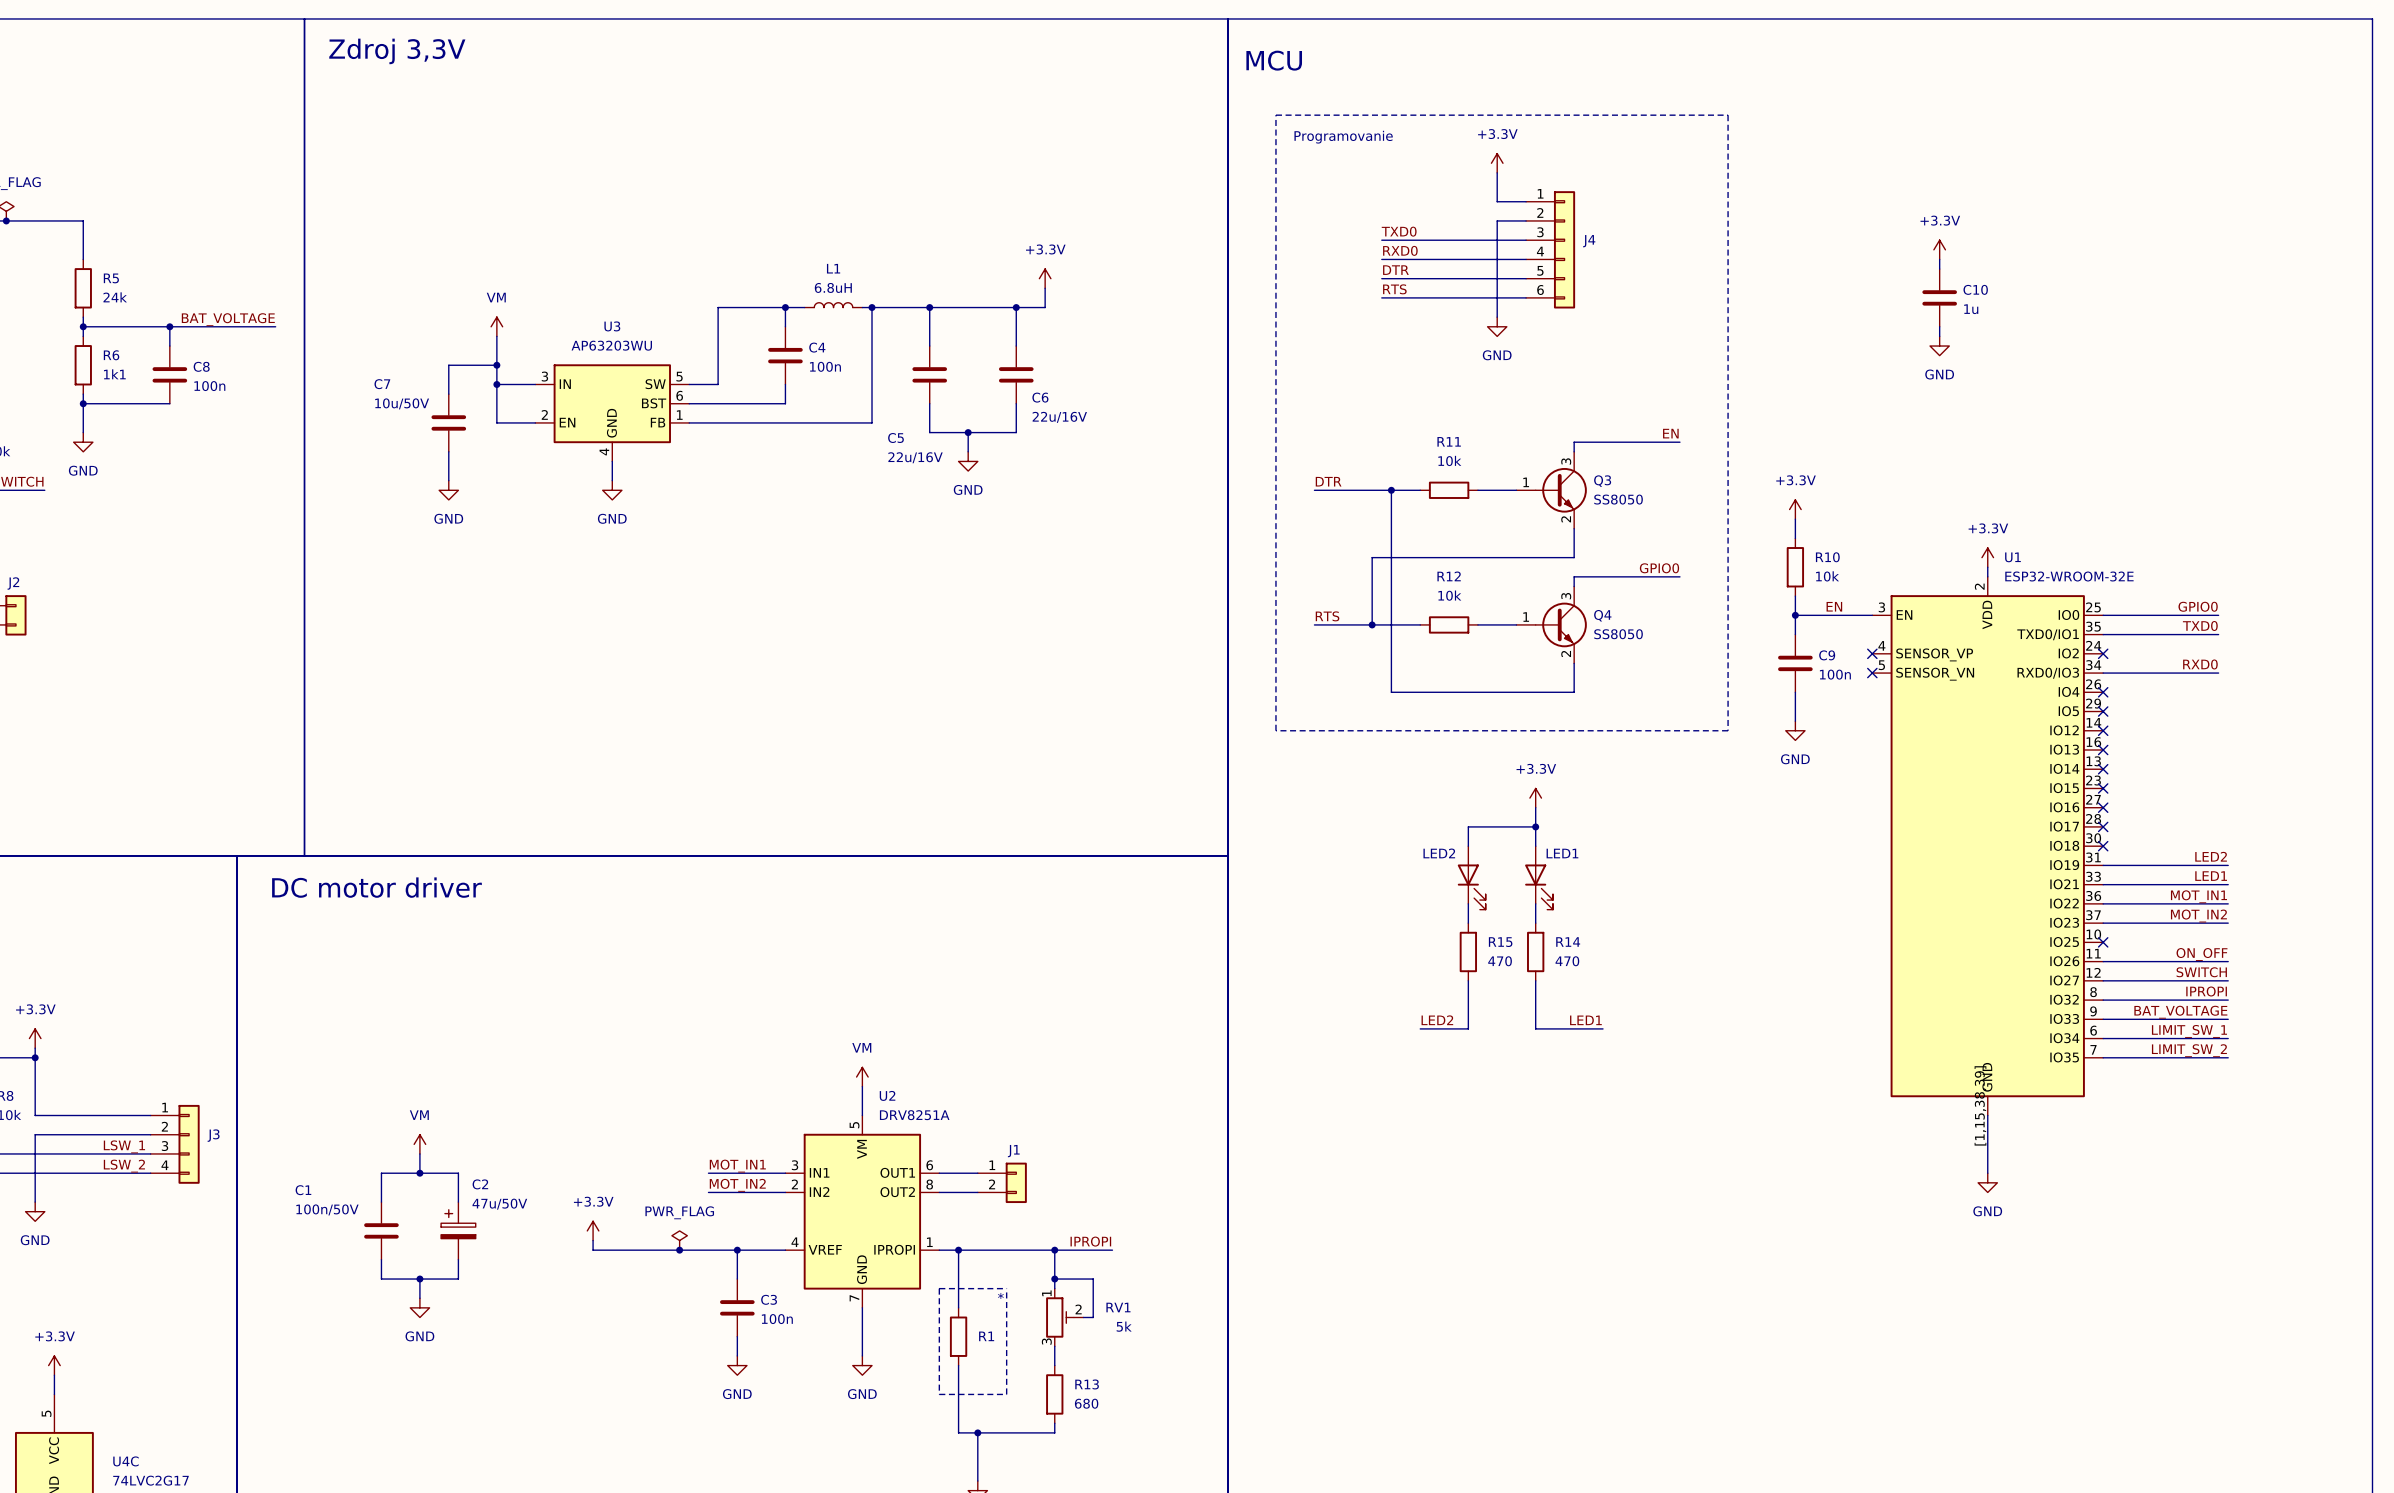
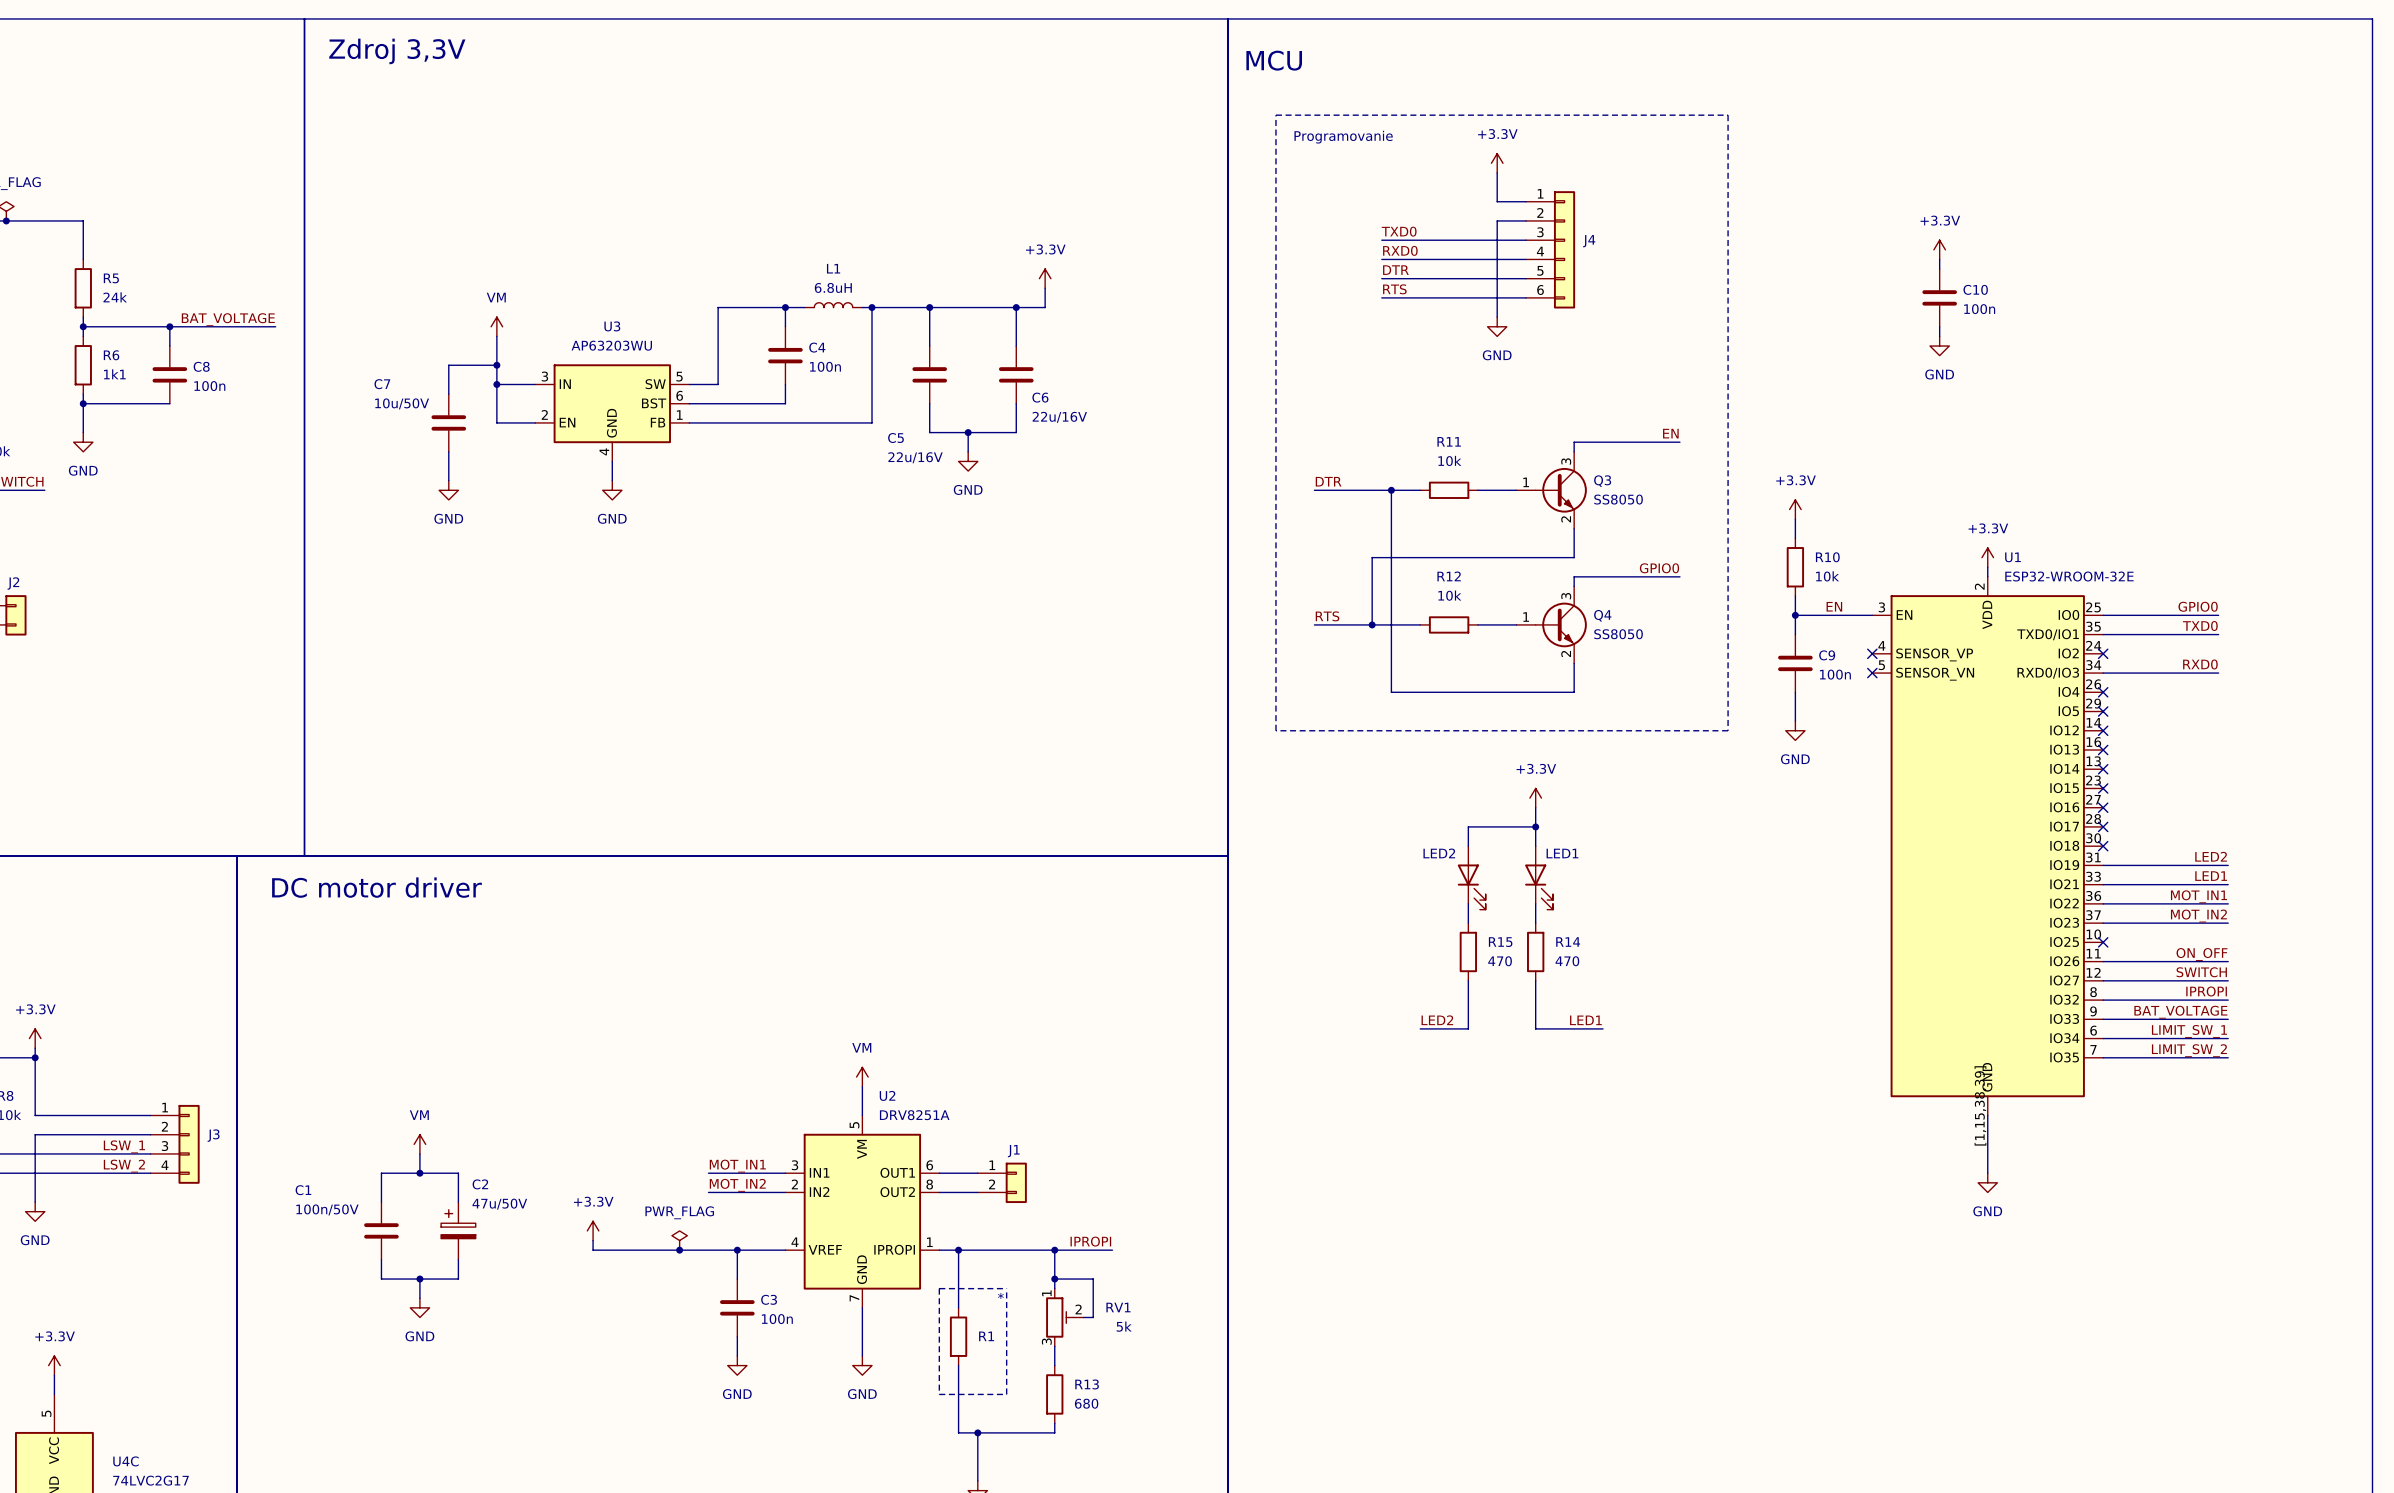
C10 value: 1u (1971, 309) -> 100n (1979, 309)

